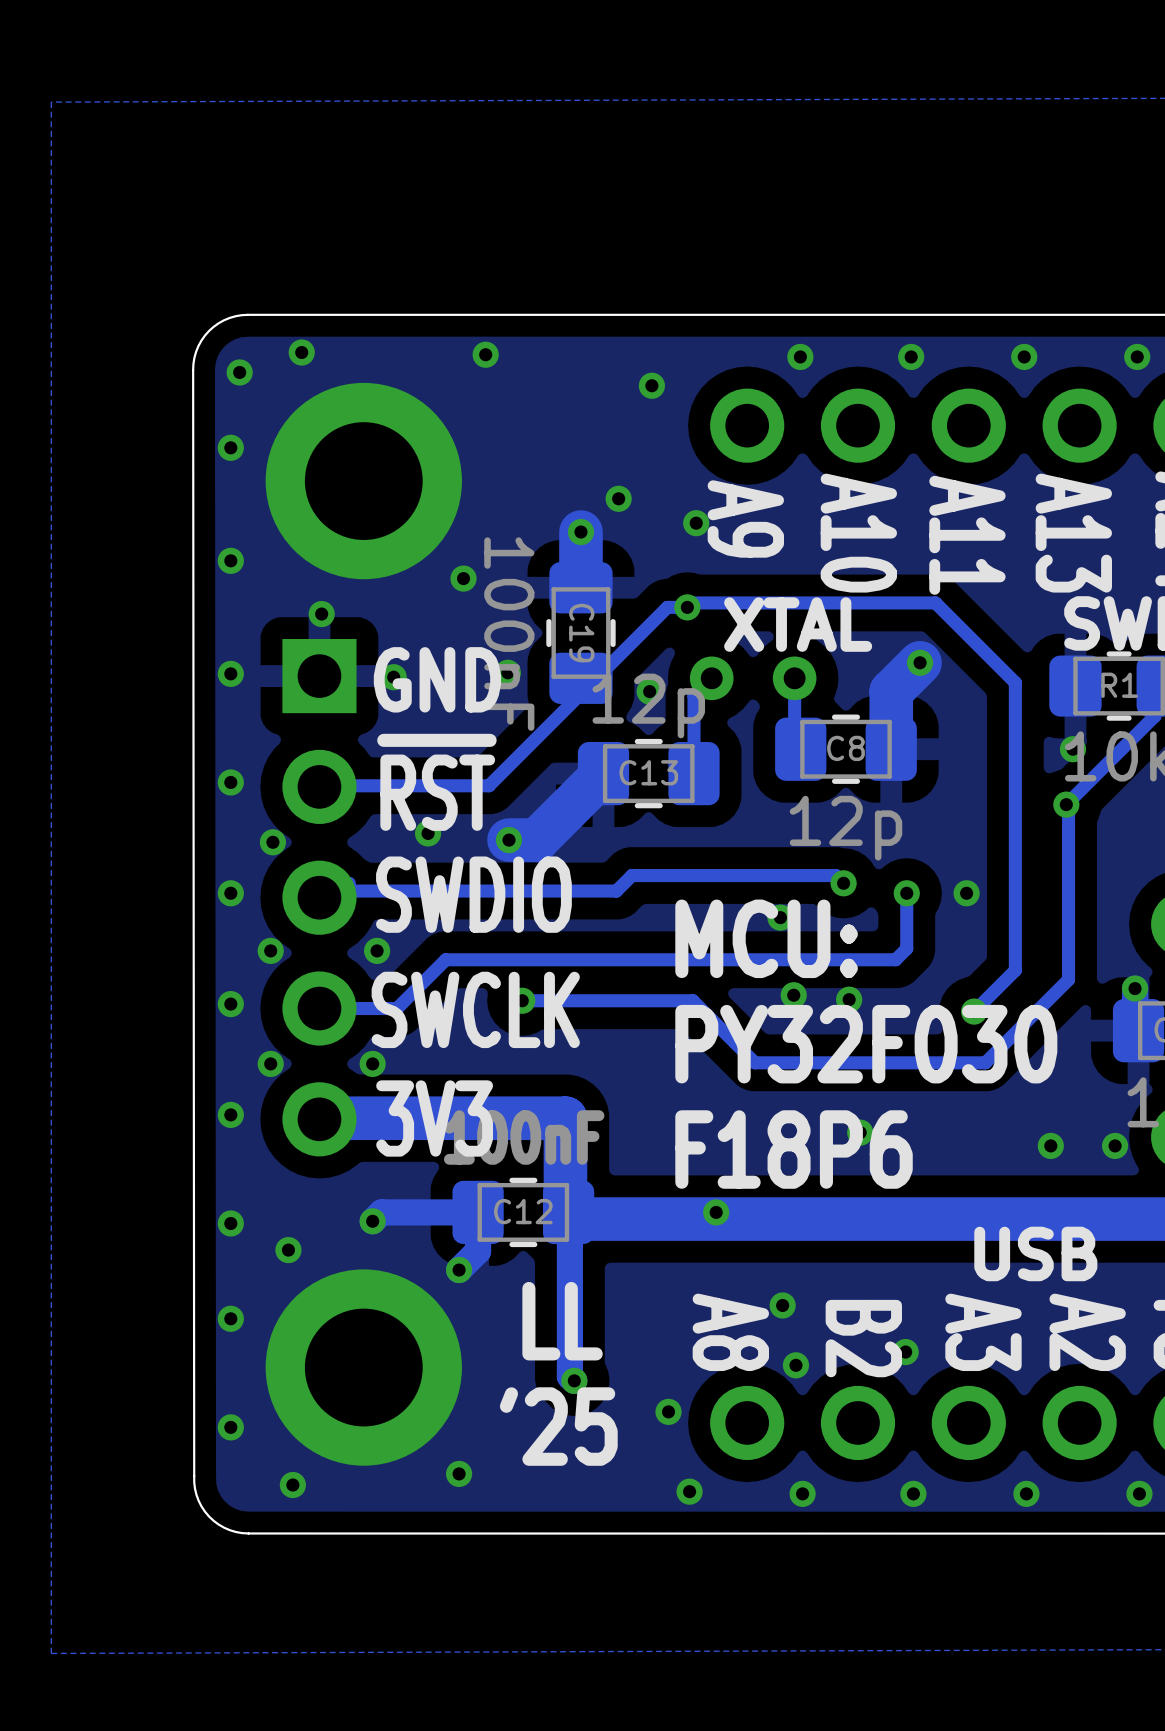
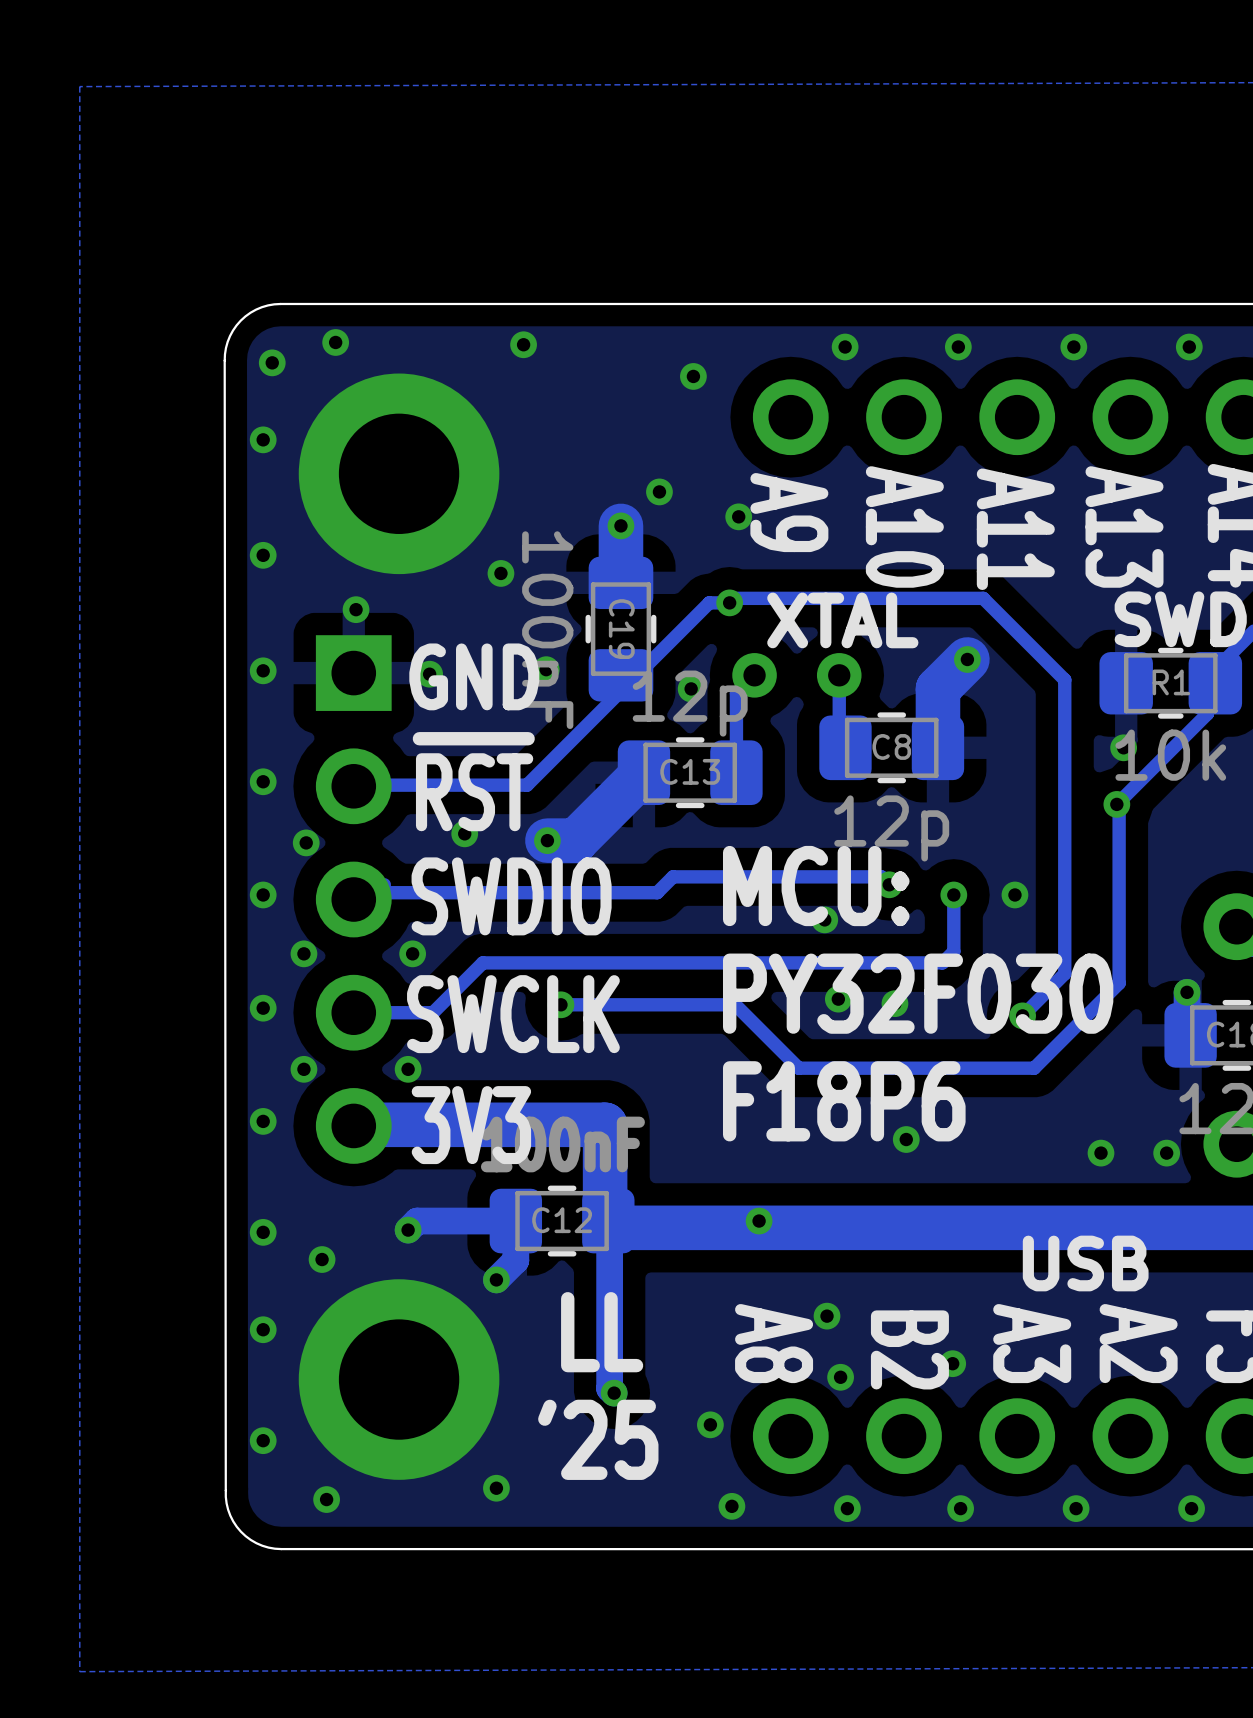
text position: MCU: (766, 938) -> MCU: (816, 886)
text position: PY32F030 (866, 1044) -> PY32F030 (918, 993)
text position: F18P6 (794, 1149) -> F18P6 (844, 1101)

